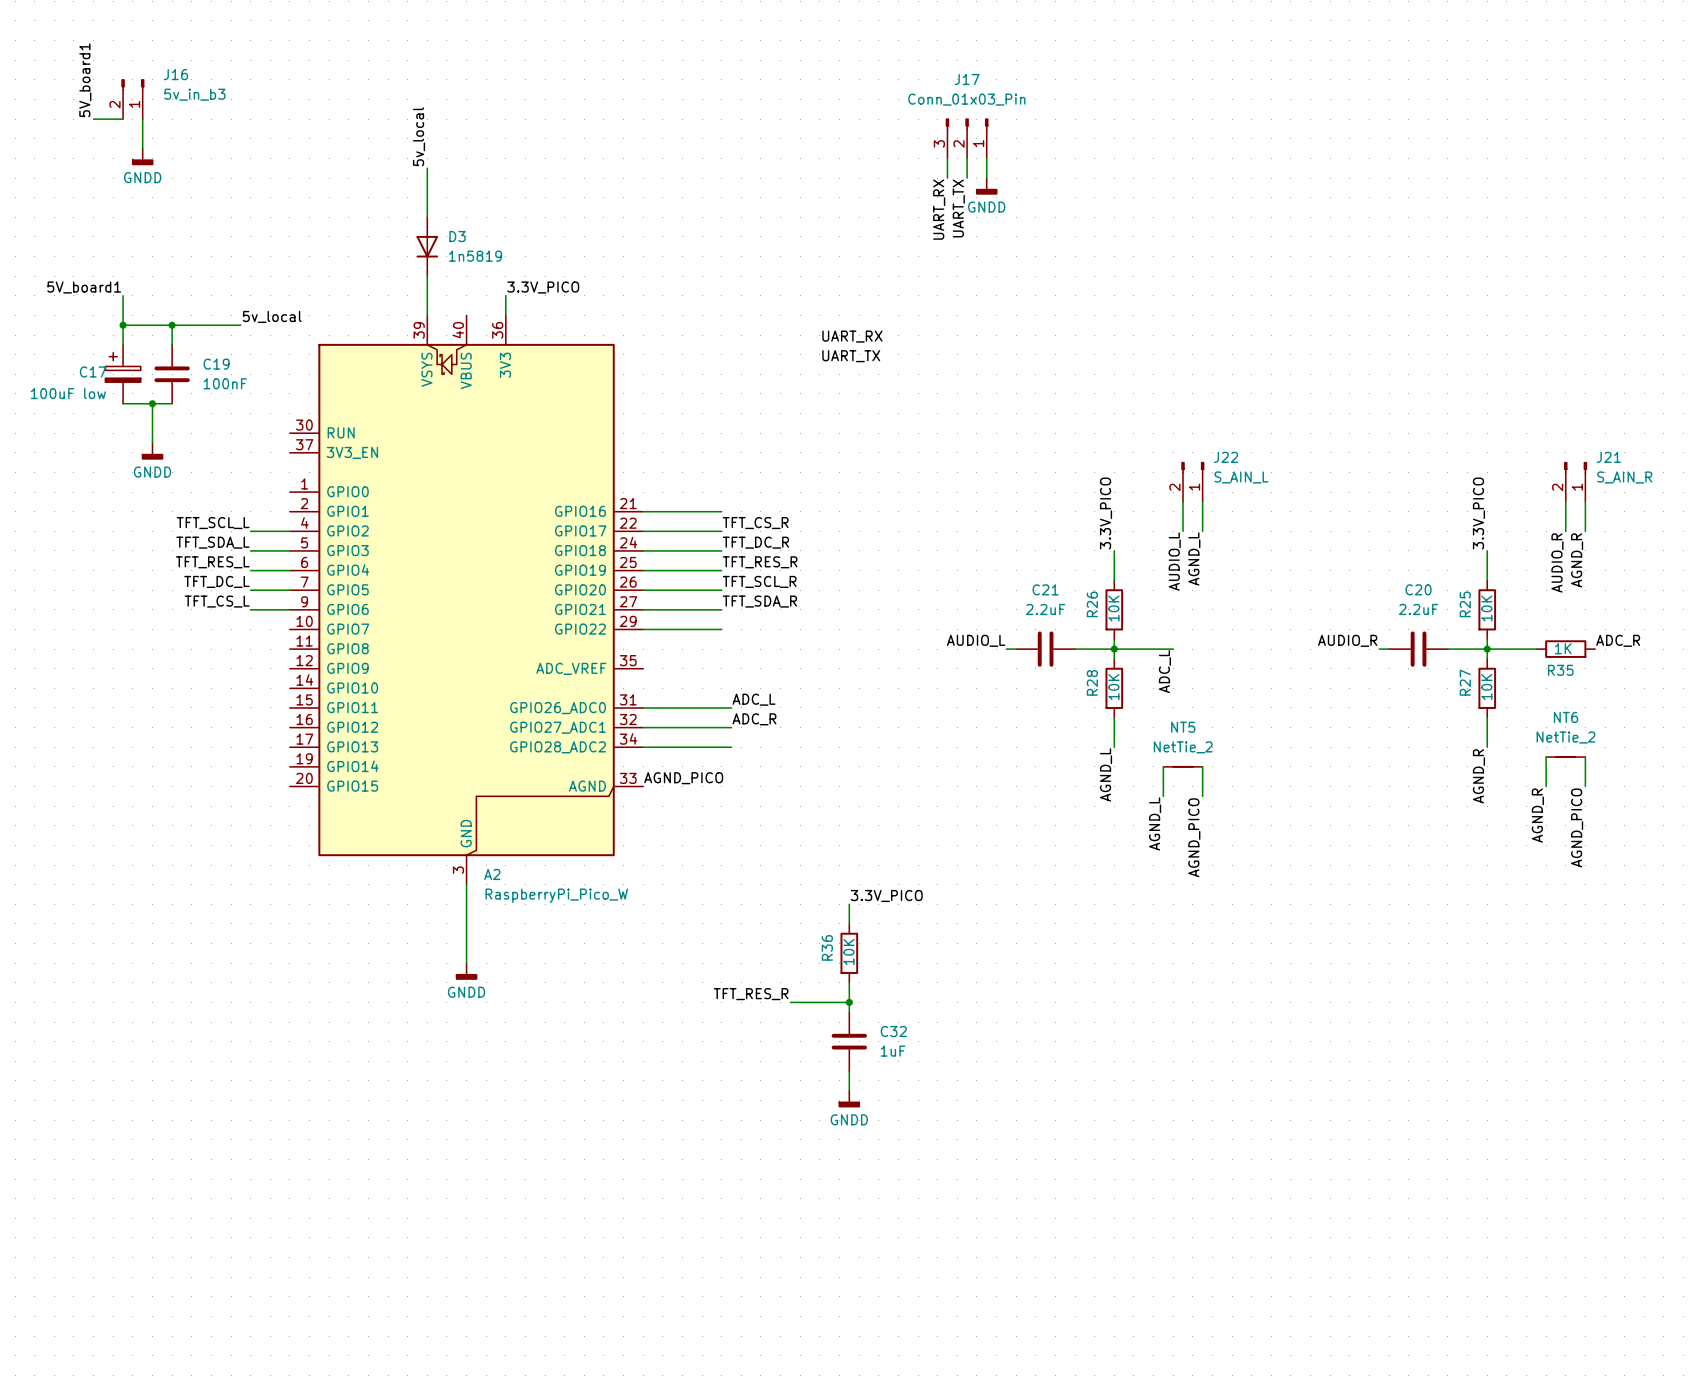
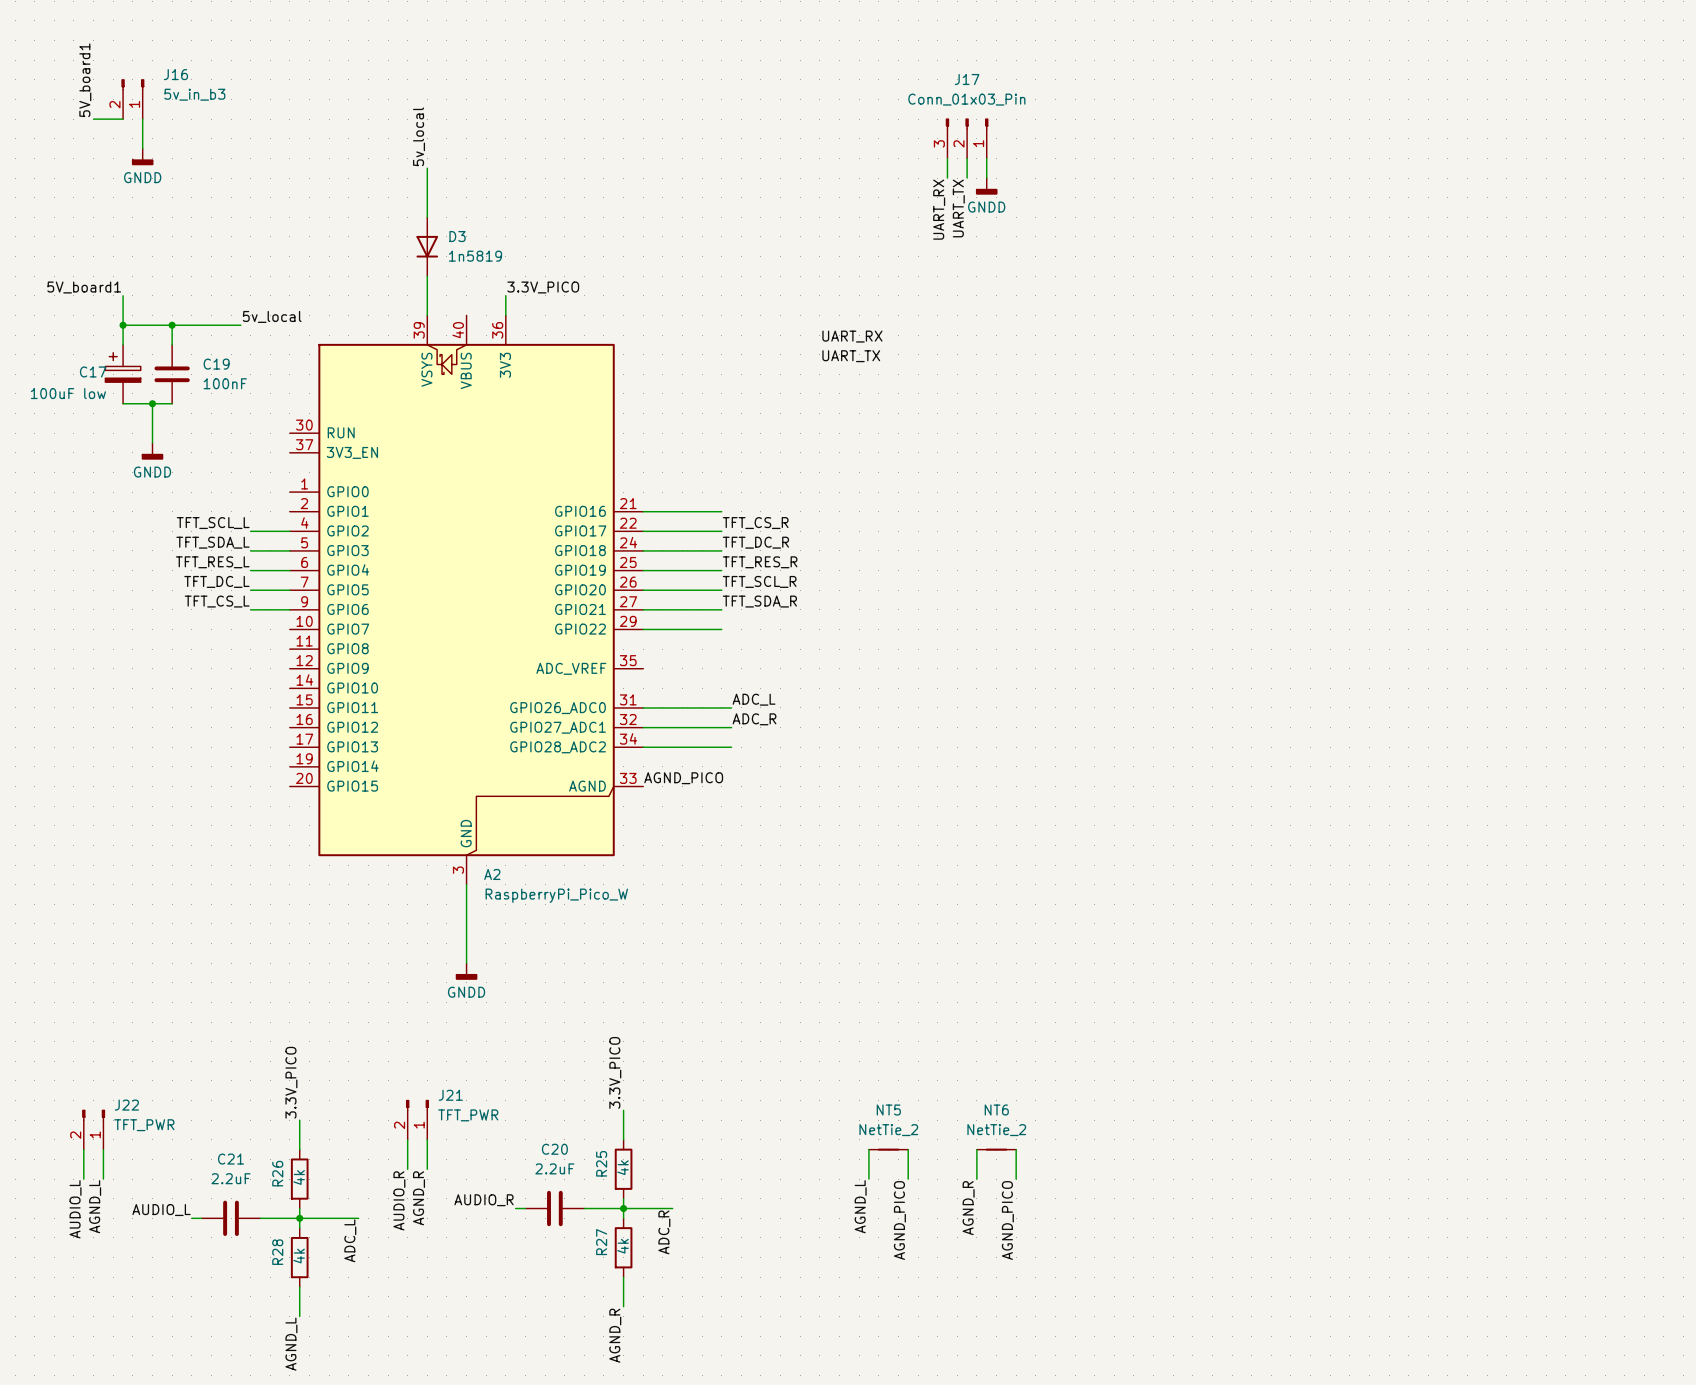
J22 value: S_AIN_L (1241, 477) -> TFT_PWR (144, 1125)
J21 value: S_AIN_R (1624, 477) -> TFT_PWR (468, 1115)
J22 position: (1192, 481) -> (93, 1129)
J21 position: (1575, 481) -> (417, 1119)
wire: (1183, 501) (1183, 531) -> none
wire: (1202, 501) (1202, 531) -> none
wire: (1565, 501) (1565, 531) -> none
wire: (1585, 501) (1585, 531) -> none
label: 3.3V_PICO (1106, 513) -> none
label: 3.3V_PICO (1478, 513) -> none
wire: (1114, 550) (1114, 580) -> none
wire: (1487, 550) (1487, 580) -> none
label: AGND_L (1194, 558) -> none
label: AGND_R (1577, 560) -> none
label: AUDIO_L (1174, 561) -> none
label: AUDIO_R (1557, 562) -> none
R26 value: 10K (1113, 608) -> 4k (299, 1177)
R25 value: 10K (1486, 608) -> 4k (622, 1167)
R26 position: (1114, 609) -> (299, 1179)
R25 position: (1487, 609) -> (623, 1169)
wire: (1114, 639) (1114, 658) -> none
wire: (1487, 639) (1487, 658) -> none
label: AUDIO_L (976, 640) -> none
label: AUDIO_R (1347, 640) -> none
label: ADC_R (1618, 640) -> none
wire: (1006, 649) (1016, 649) -> none
C21 position: (1045, 649) -> (231, 1218)
wire: (1075, 649) (1173, 649) -> none
junction: (1114, 649) -> none
wire: (1379, 649) (1389, 649) -> none
C20 position: (1418, 649) -> (554, 1208)
wire: (1447, 649) (1536, 649) -> none
junction: (1487, 649) -> none
R35: 1K (1565, 649) -> none
label: ADC_L (1164, 671) -> none
R28 value: 10K (1113, 687) -> 4k (299, 1256)
R27 value: 10K (1486, 687) -> 4k (622, 1246)
R28 position: (1114, 688) -> (299, 1257)
R27 position: (1487, 688) -> (623, 1247)
wire: (1114, 717) (1114, 747) -> none
wire: (1487, 717) (1487, 747) -> none
wire: (1546, 757) (1546, 786) -> none
NT6 position: (1565, 757) -> (996, 1149)
wire: (1585, 757) (1585, 786) -> none
wire: (1163, 766) (1163, 796) -> none
NT5 position: (1183, 766) -> (888, 1149)
wire: (1202, 766) (1202, 796) -> none
label: AGND_L (1106, 774) -> none
label: AGND_R (1478, 776) -> none
label: AGND_R (1537, 815) -> none
label: AGND_L (1155, 823) -> none
label: AGND_PICO (1577, 827) -> none
label: AGND_PICO (1194, 837) -> none
label: 3.3V_PICO (886, 895) -> none
wire: (849, 904) (849, 923) -> none
R36: 10K (849, 953) -> none
wire: (849, 982) (849, 1012) -> (868, 1149) (868, 1179)
label: TFT_RES_R (751, 994) -> none
wire: (790, 1002) (849, 1002) -> none
junction: (849, 1002) -> none
C32: 1uF (849, 1041) -> none
wire: (849, 1071) (849, 1090) -> none
label: none -> 3.3V_PICO (615, 1072)
label: none -> 3.3V_PICO (291, 1082)
power symbol: GNDD (849, 1099) -> none
wire: none -> (623, 1110) (623, 1139)
wire: none -> (299, 1120) (299, 1149)
wire: none -> (407, 1139) (407, 1169)
wire: none -> (427, 1139) (427, 1169)
wire: none -> (83, 1149) (83, 1179)
wire: none -> (103, 1149) (103, 1179)
wire: none -> (908, 1149) (908, 1179)
wire: none -> (976, 1149) (976, 1179)
wire: none -> (1016, 1149) (1016, 1179)
label: none -> AGND_R (419, 1198)
wire: none -> (623, 1198) (623, 1218)
label: none -> AUDIO_R (399, 1200)
label: none -> AUDIO_R (484, 1200)
label: none -> AGND_L (95, 1206)
label: none -> AGND_L (860, 1206)
wire: none -> (299, 1208) (299, 1228)
wire: none -> (515, 1208) (525, 1208)
wire: none -> (584, 1208) (672, 1208)
junction: none -> (623, 1208)
label: none -> AGND_R (968, 1208)
label: none -> AUDIO_L (75, 1209)
label: none -> AUDIO_L (161, 1210)
wire: none -> (191, 1218) (201, 1218)
wire: none -> (260, 1218) (358, 1218)
junction: none -> (299, 1218)
label: none -> AGND_PICO (899, 1220)
label: none -> AGND_PICO (1007, 1220)
label: none -> ADC_R (664, 1232)
label: none -> ADC_L (350, 1240)
wire: none -> (623, 1277) (623, 1306)
wire: none -> (299, 1287) (299, 1316)
label: none -> AGND_R (615, 1335)
label: none -> AGND_L (291, 1344)

